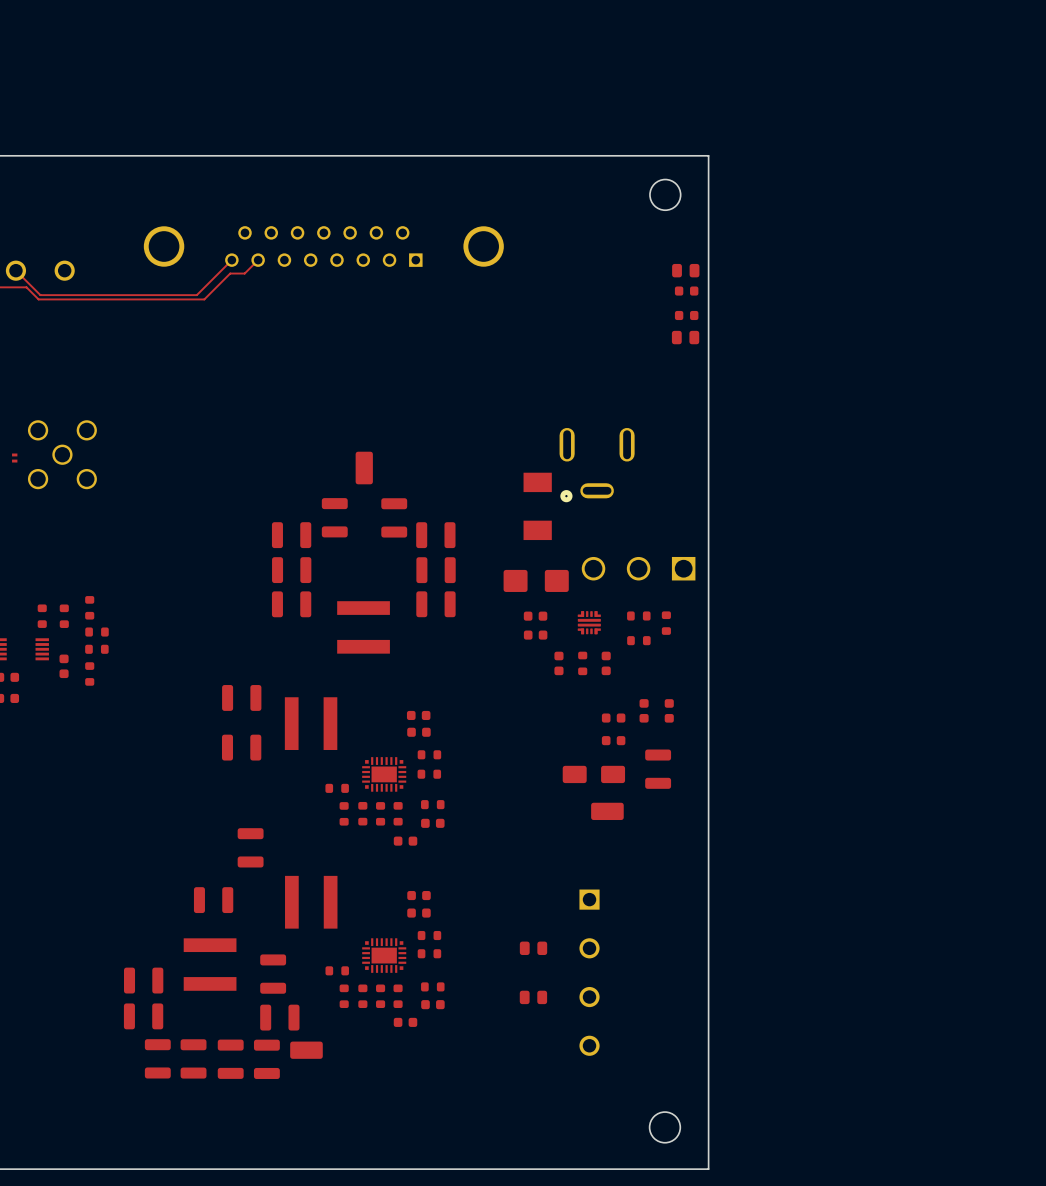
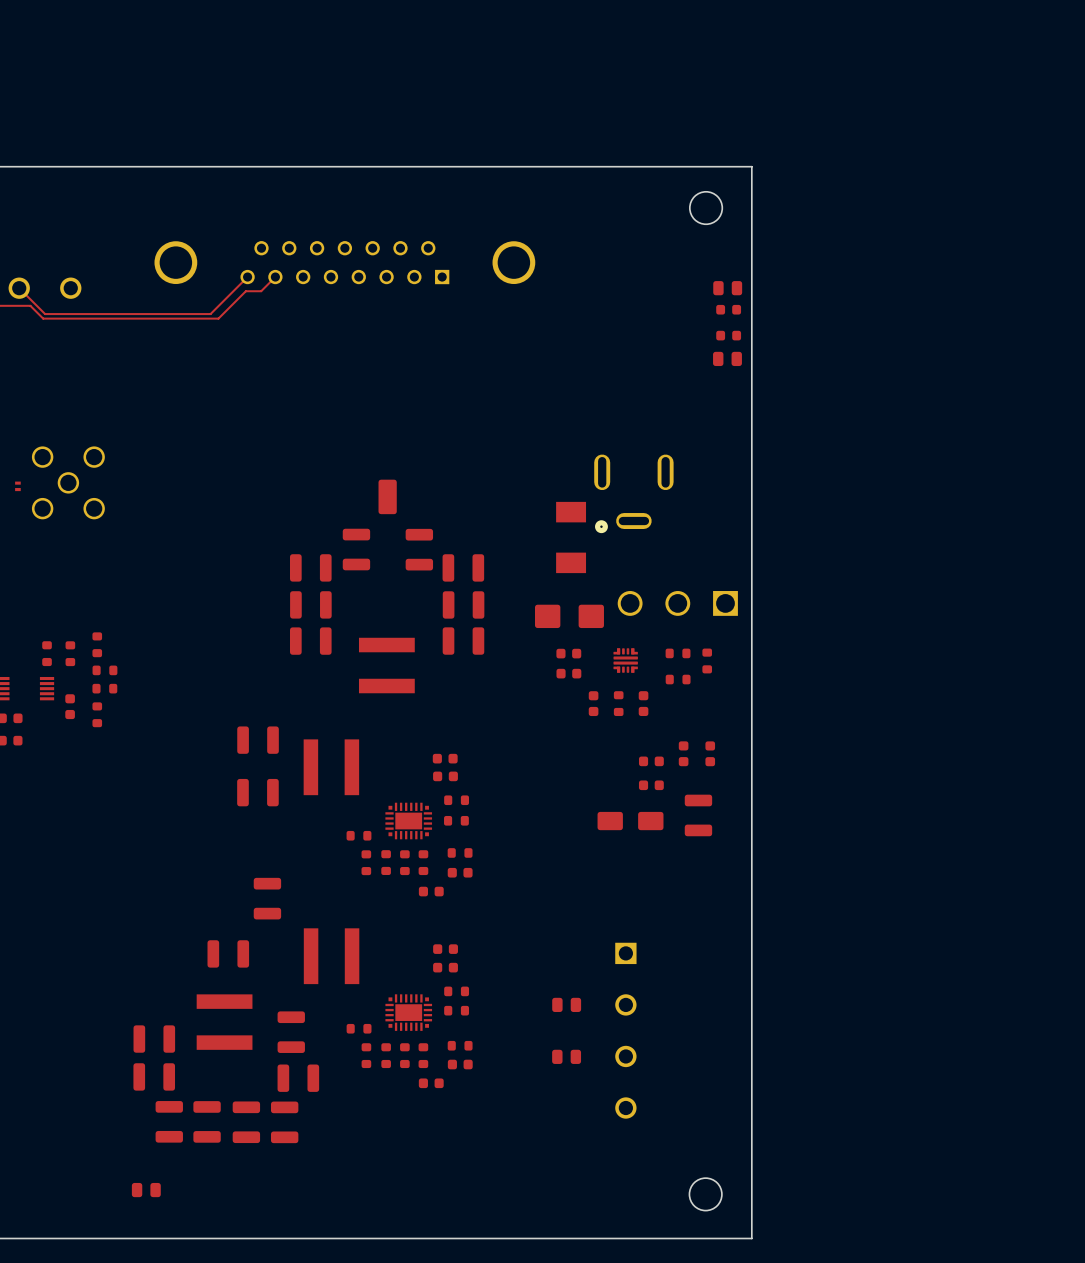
part: (607, 811) -> none
part: (306, 1050) -> none
part: none -> (146, 1190)

